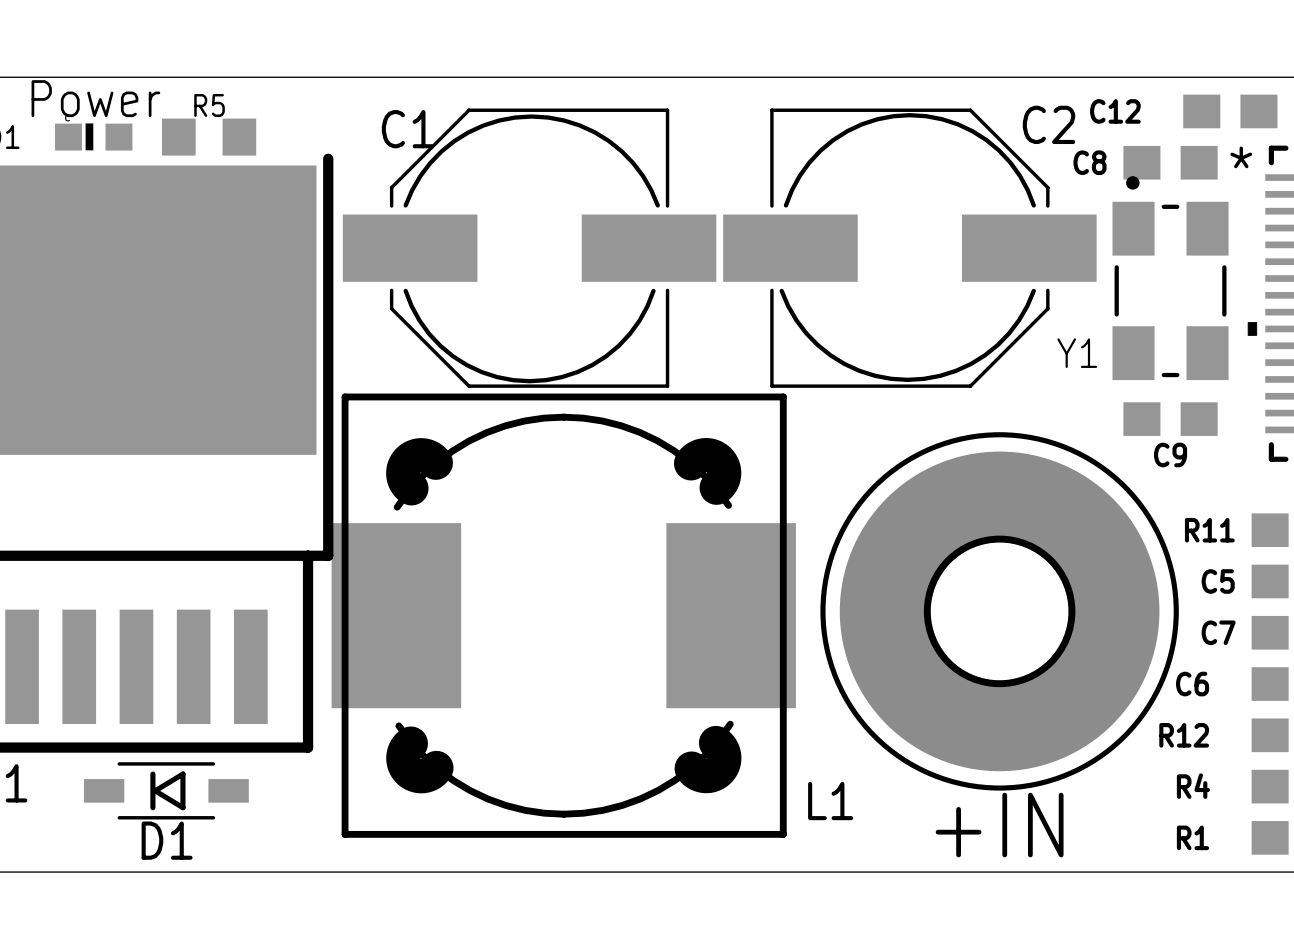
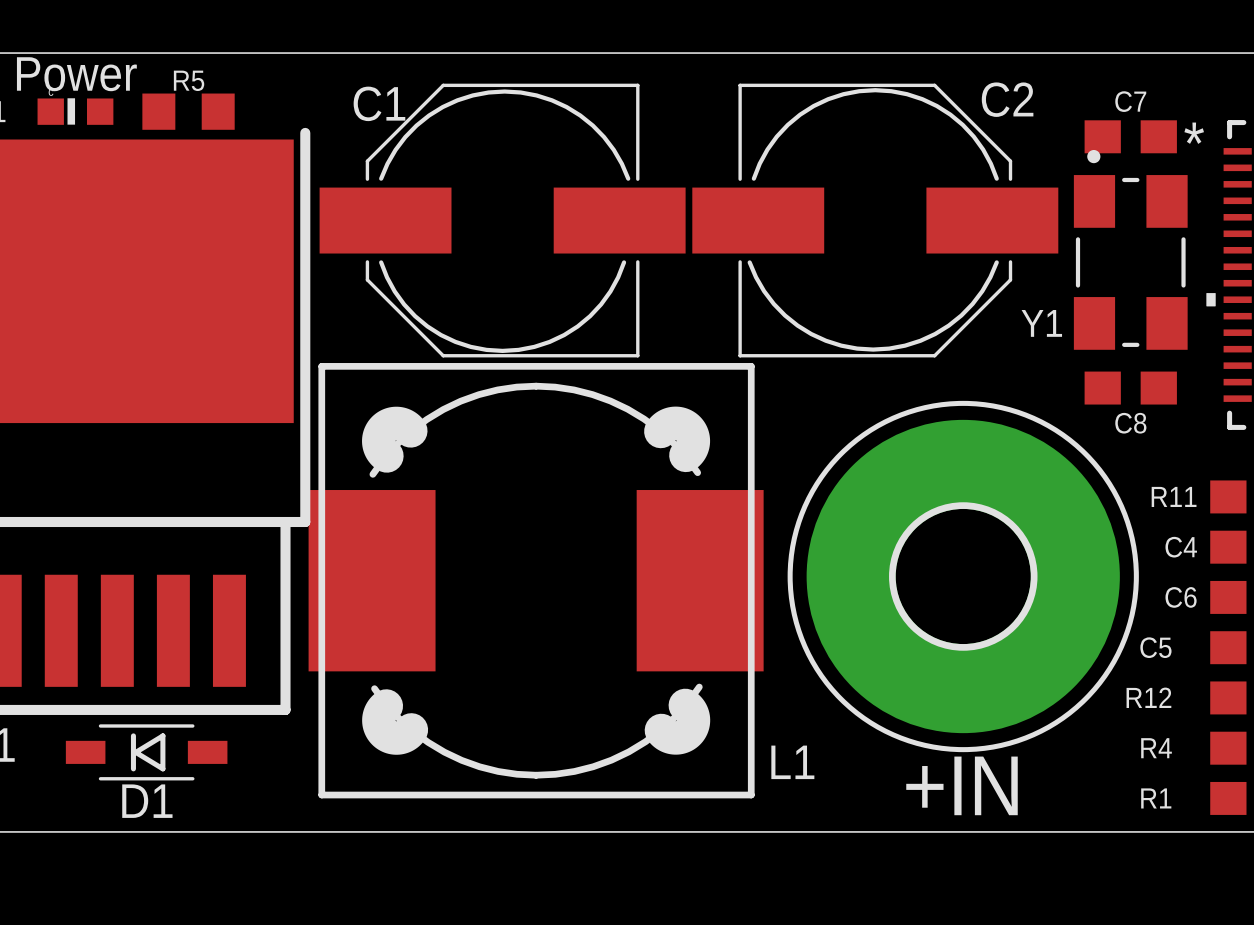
C12: (1230, 111) -> none
C8 name: C8 (1089, 162) -> C7 (1130, 101)
C9 name: C9 (1170, 455) -> C8 (1130, 423)
C5 name: C5 (1218, 581) -> C4 (1181, 547)
C7 name: C7 (1218, 632) -> C6 (1181, 597)
C6 name: C6 (1192, 684) -> C5 (1155, 647)

